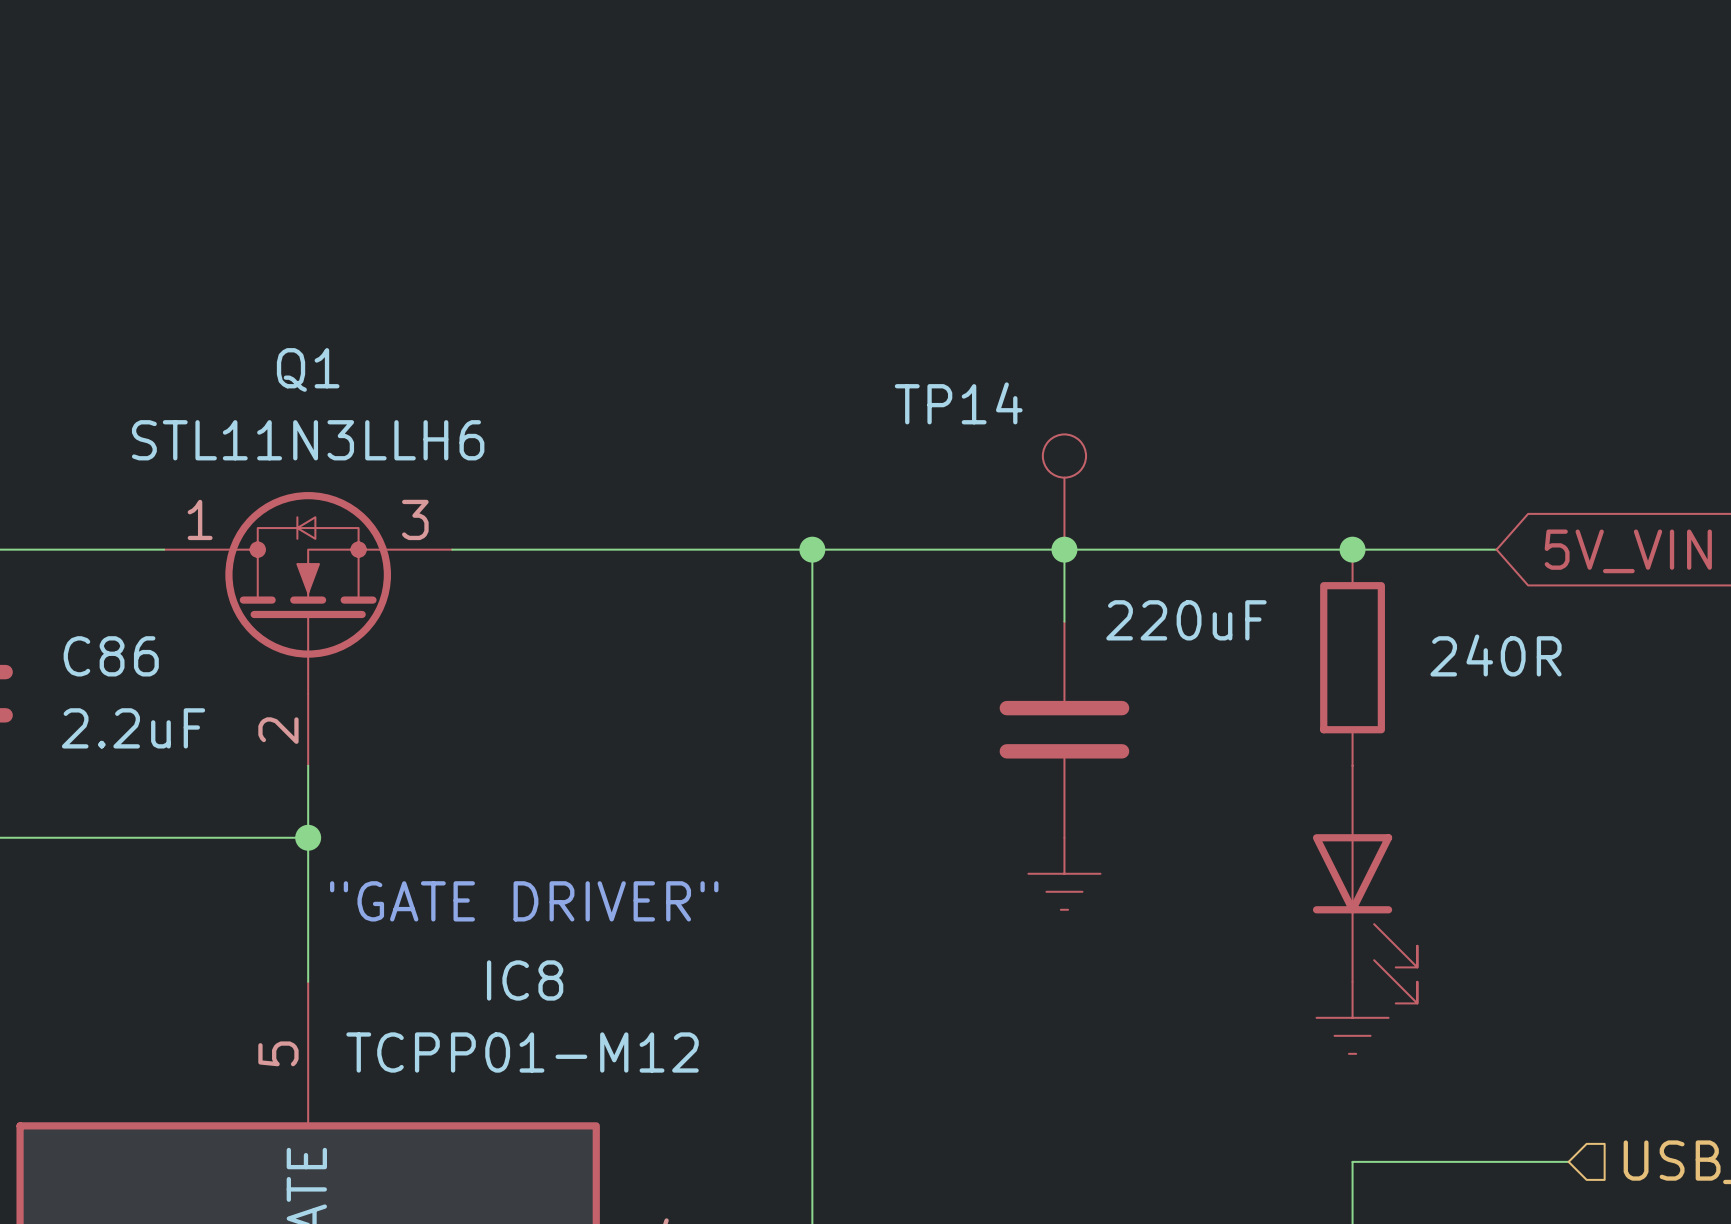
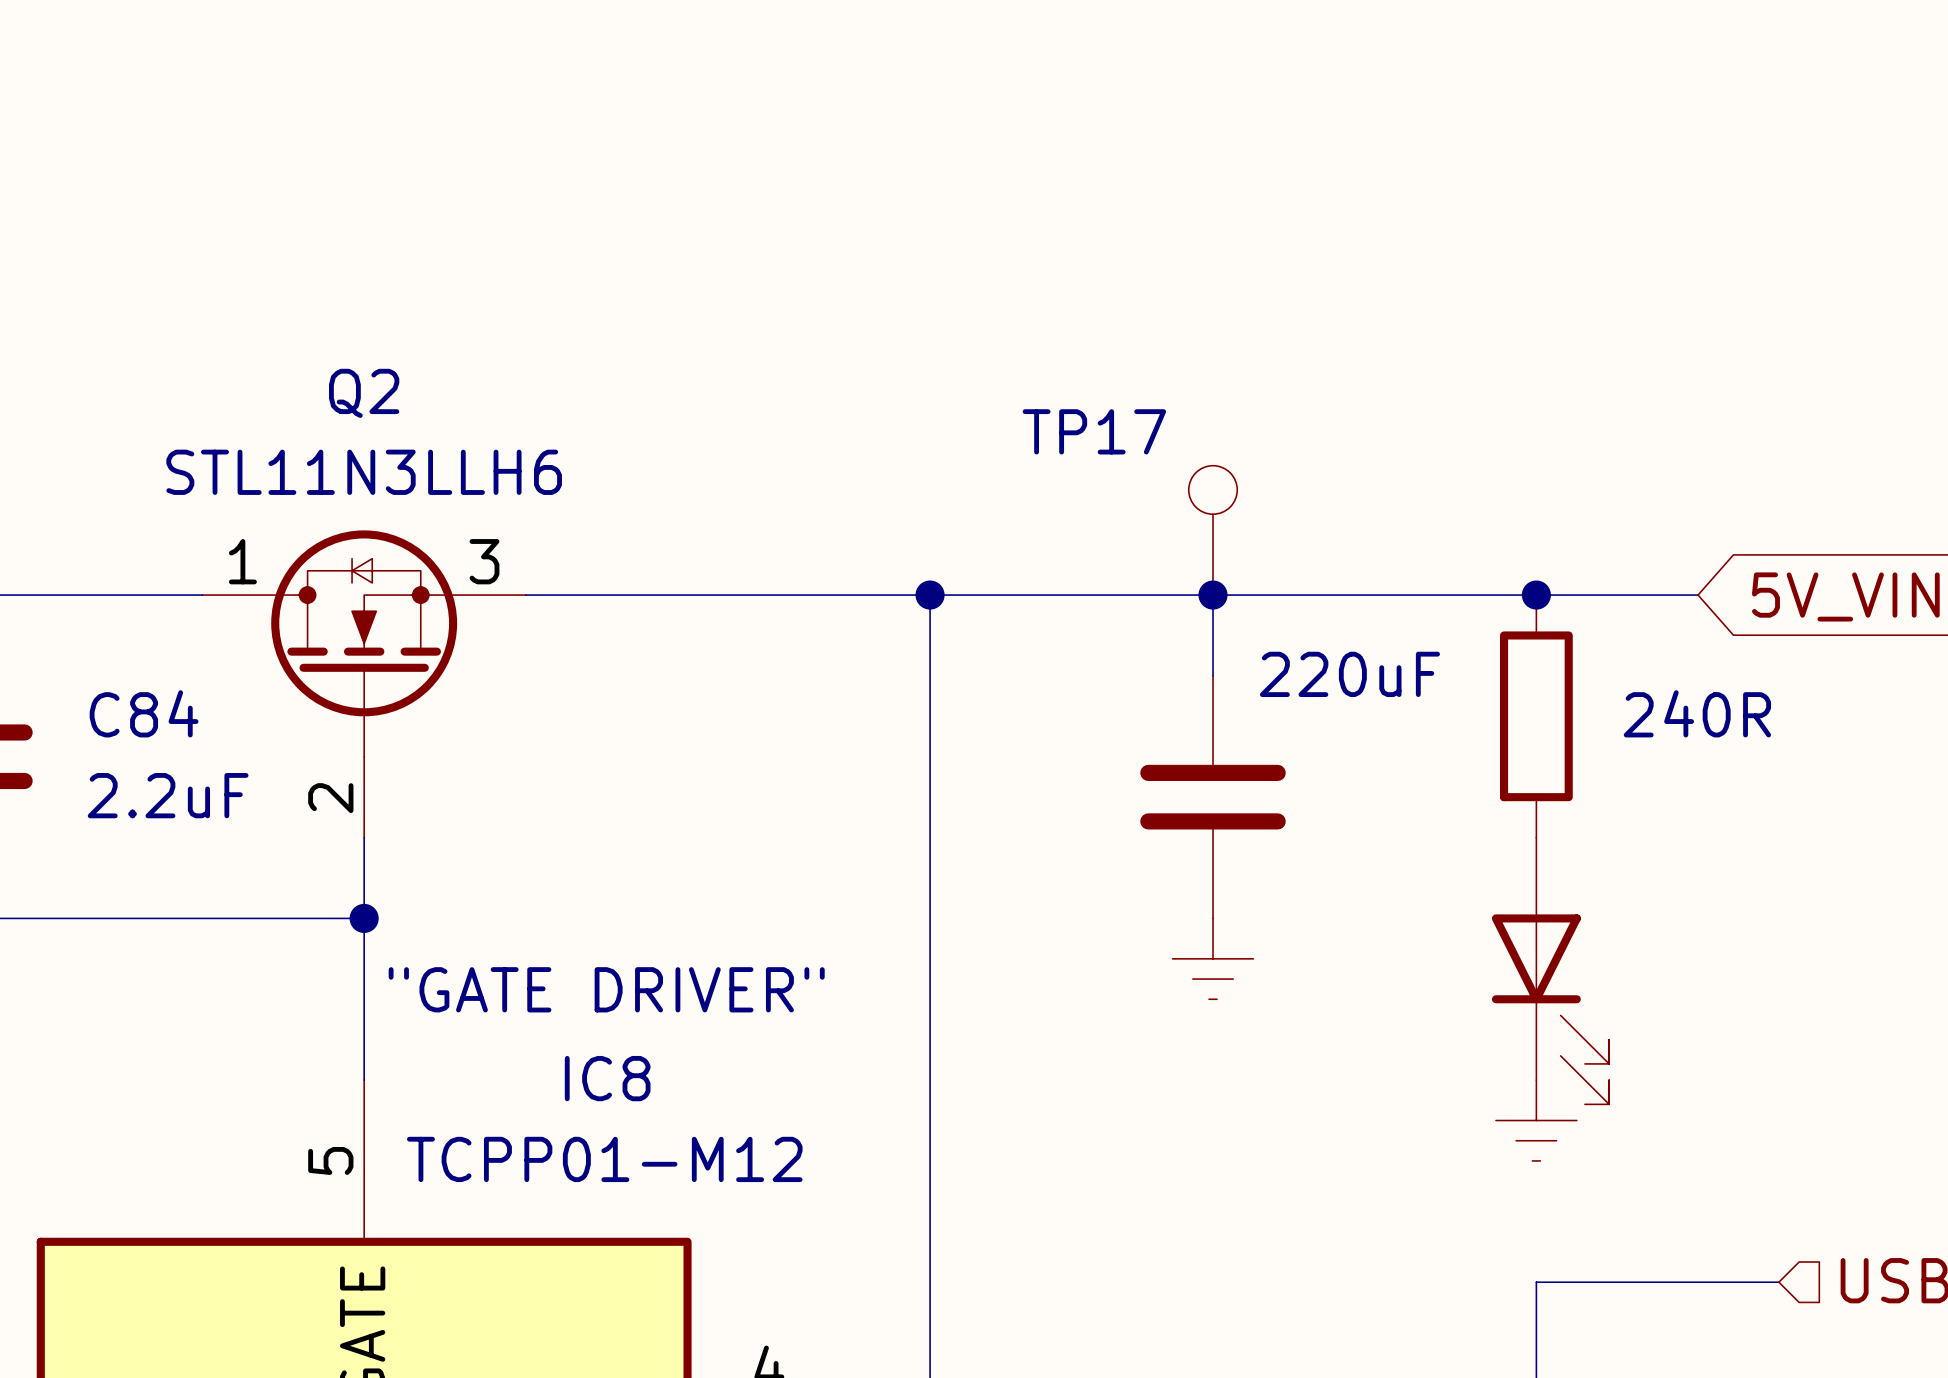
Q1 name: Q1 (308, 369) -> Q2 (364, 393)
TP14 name: TP14 (958, 403) -> TP17 (1094, 431)
C86 name: C86 (111, 656) -> C84 (144, 713)

